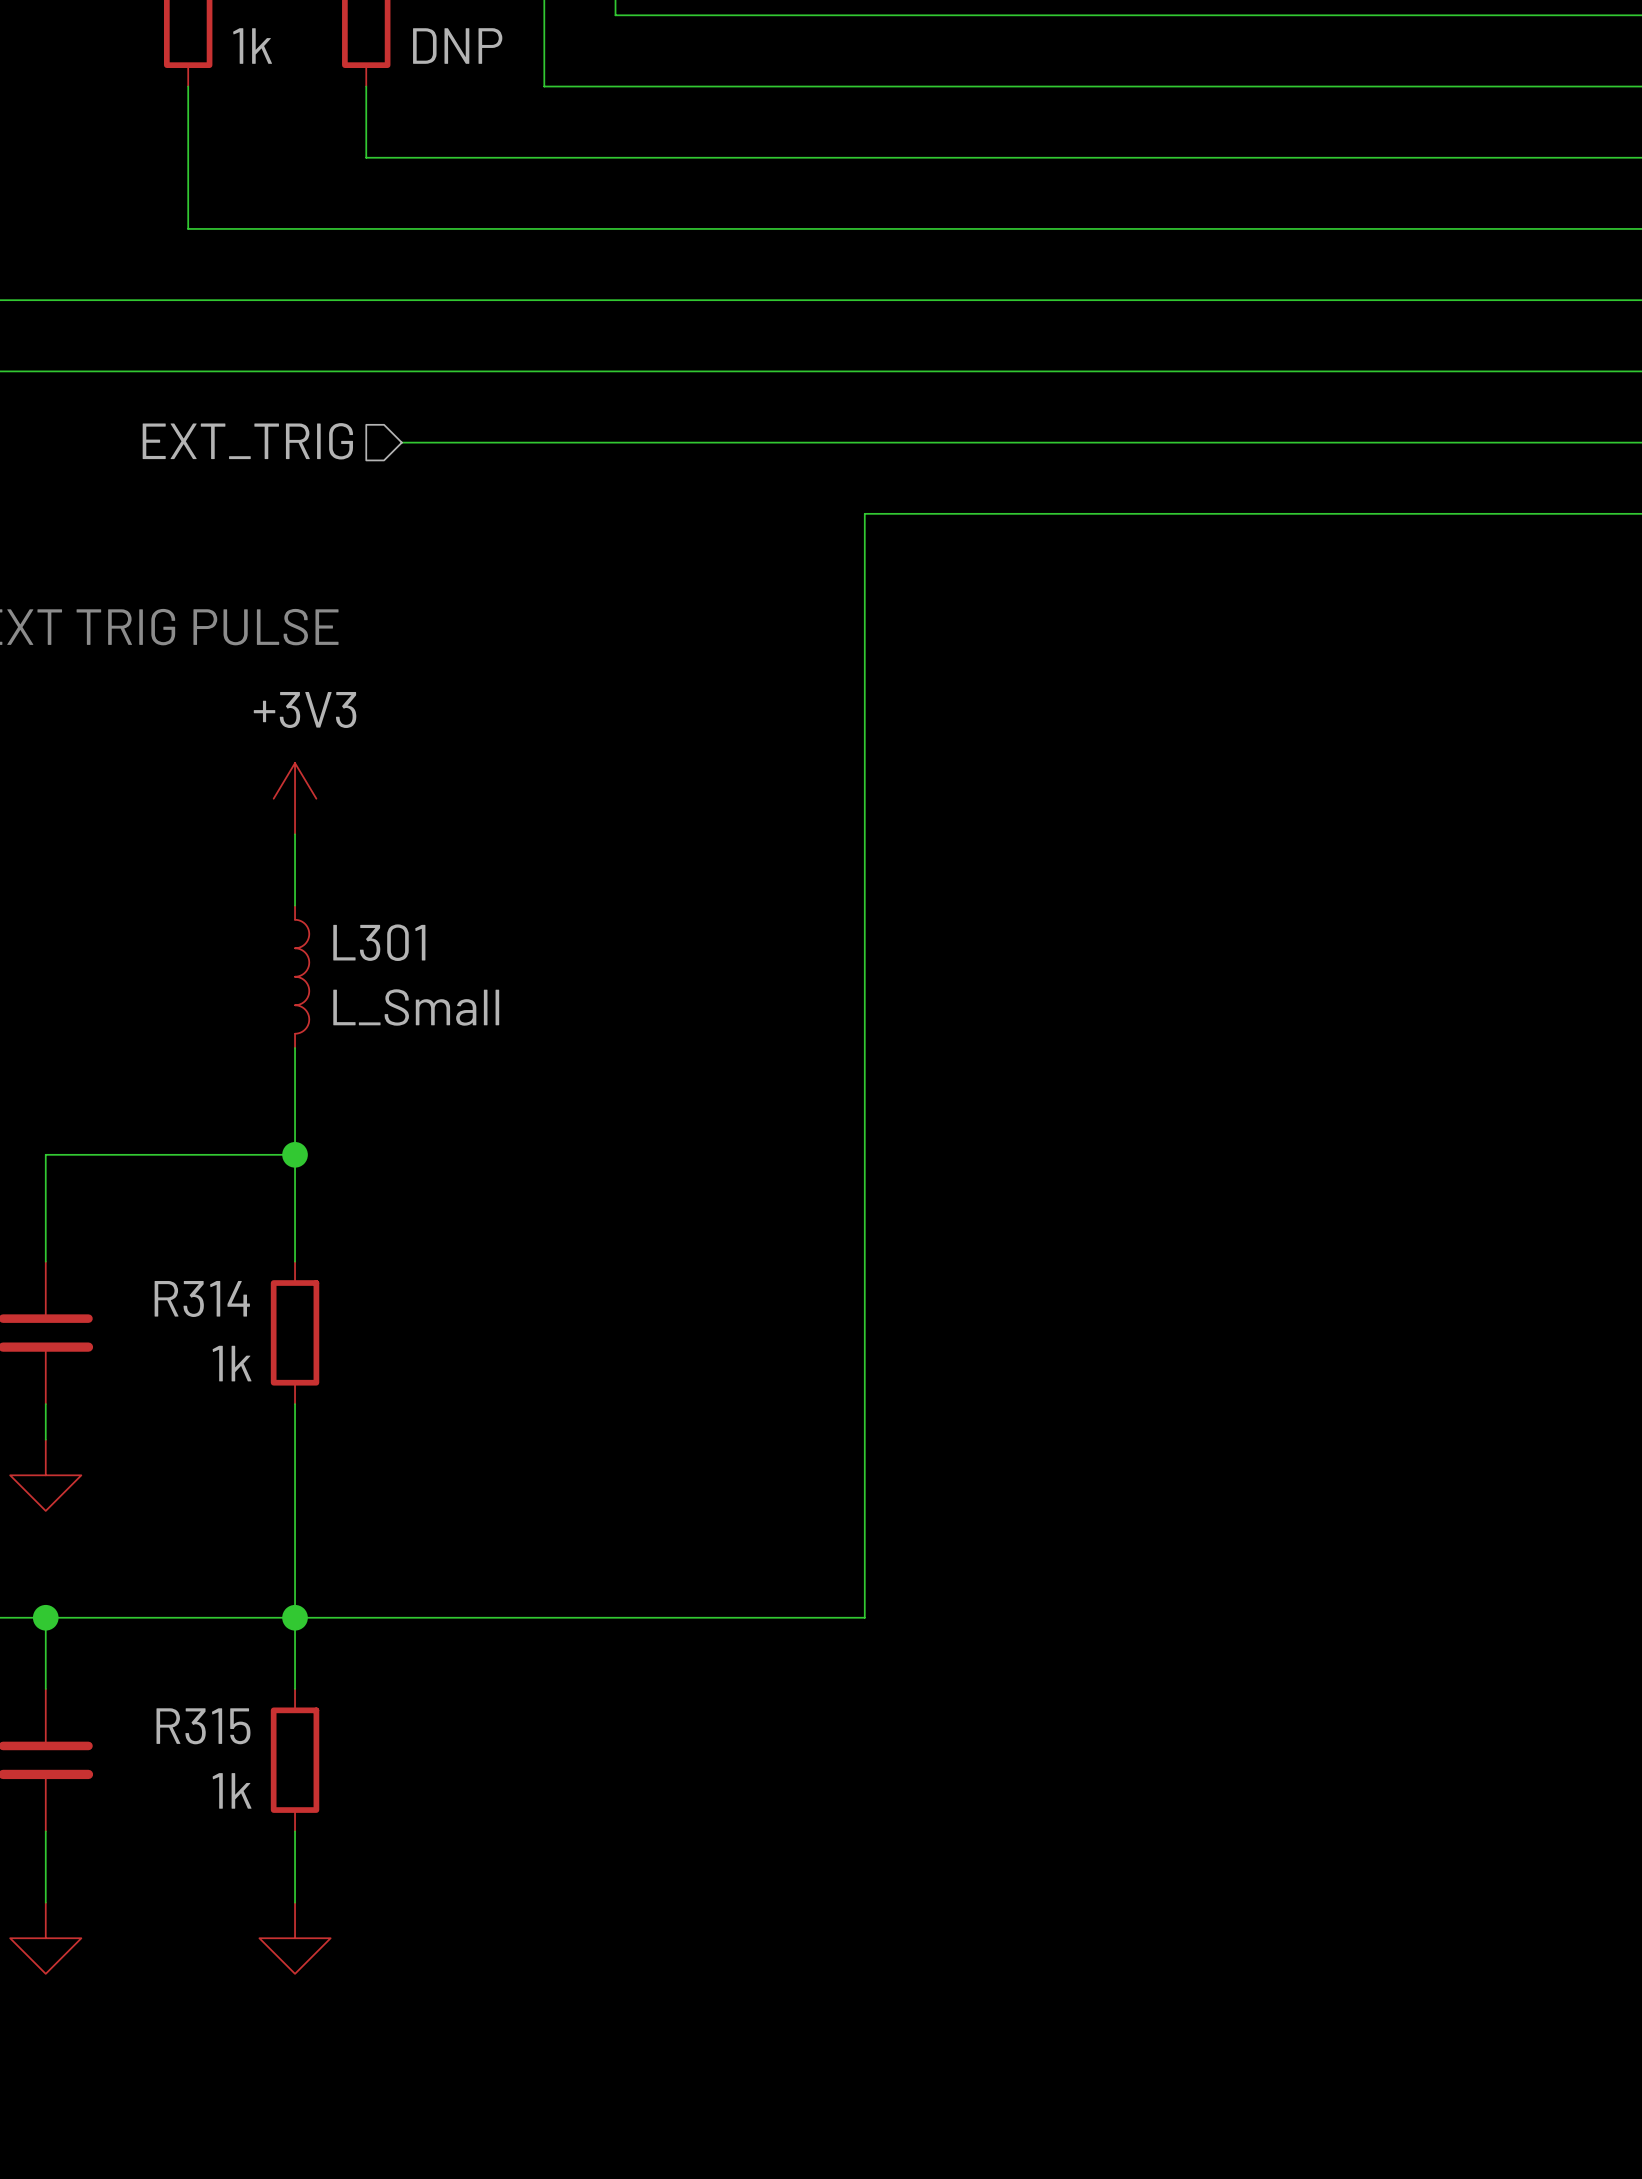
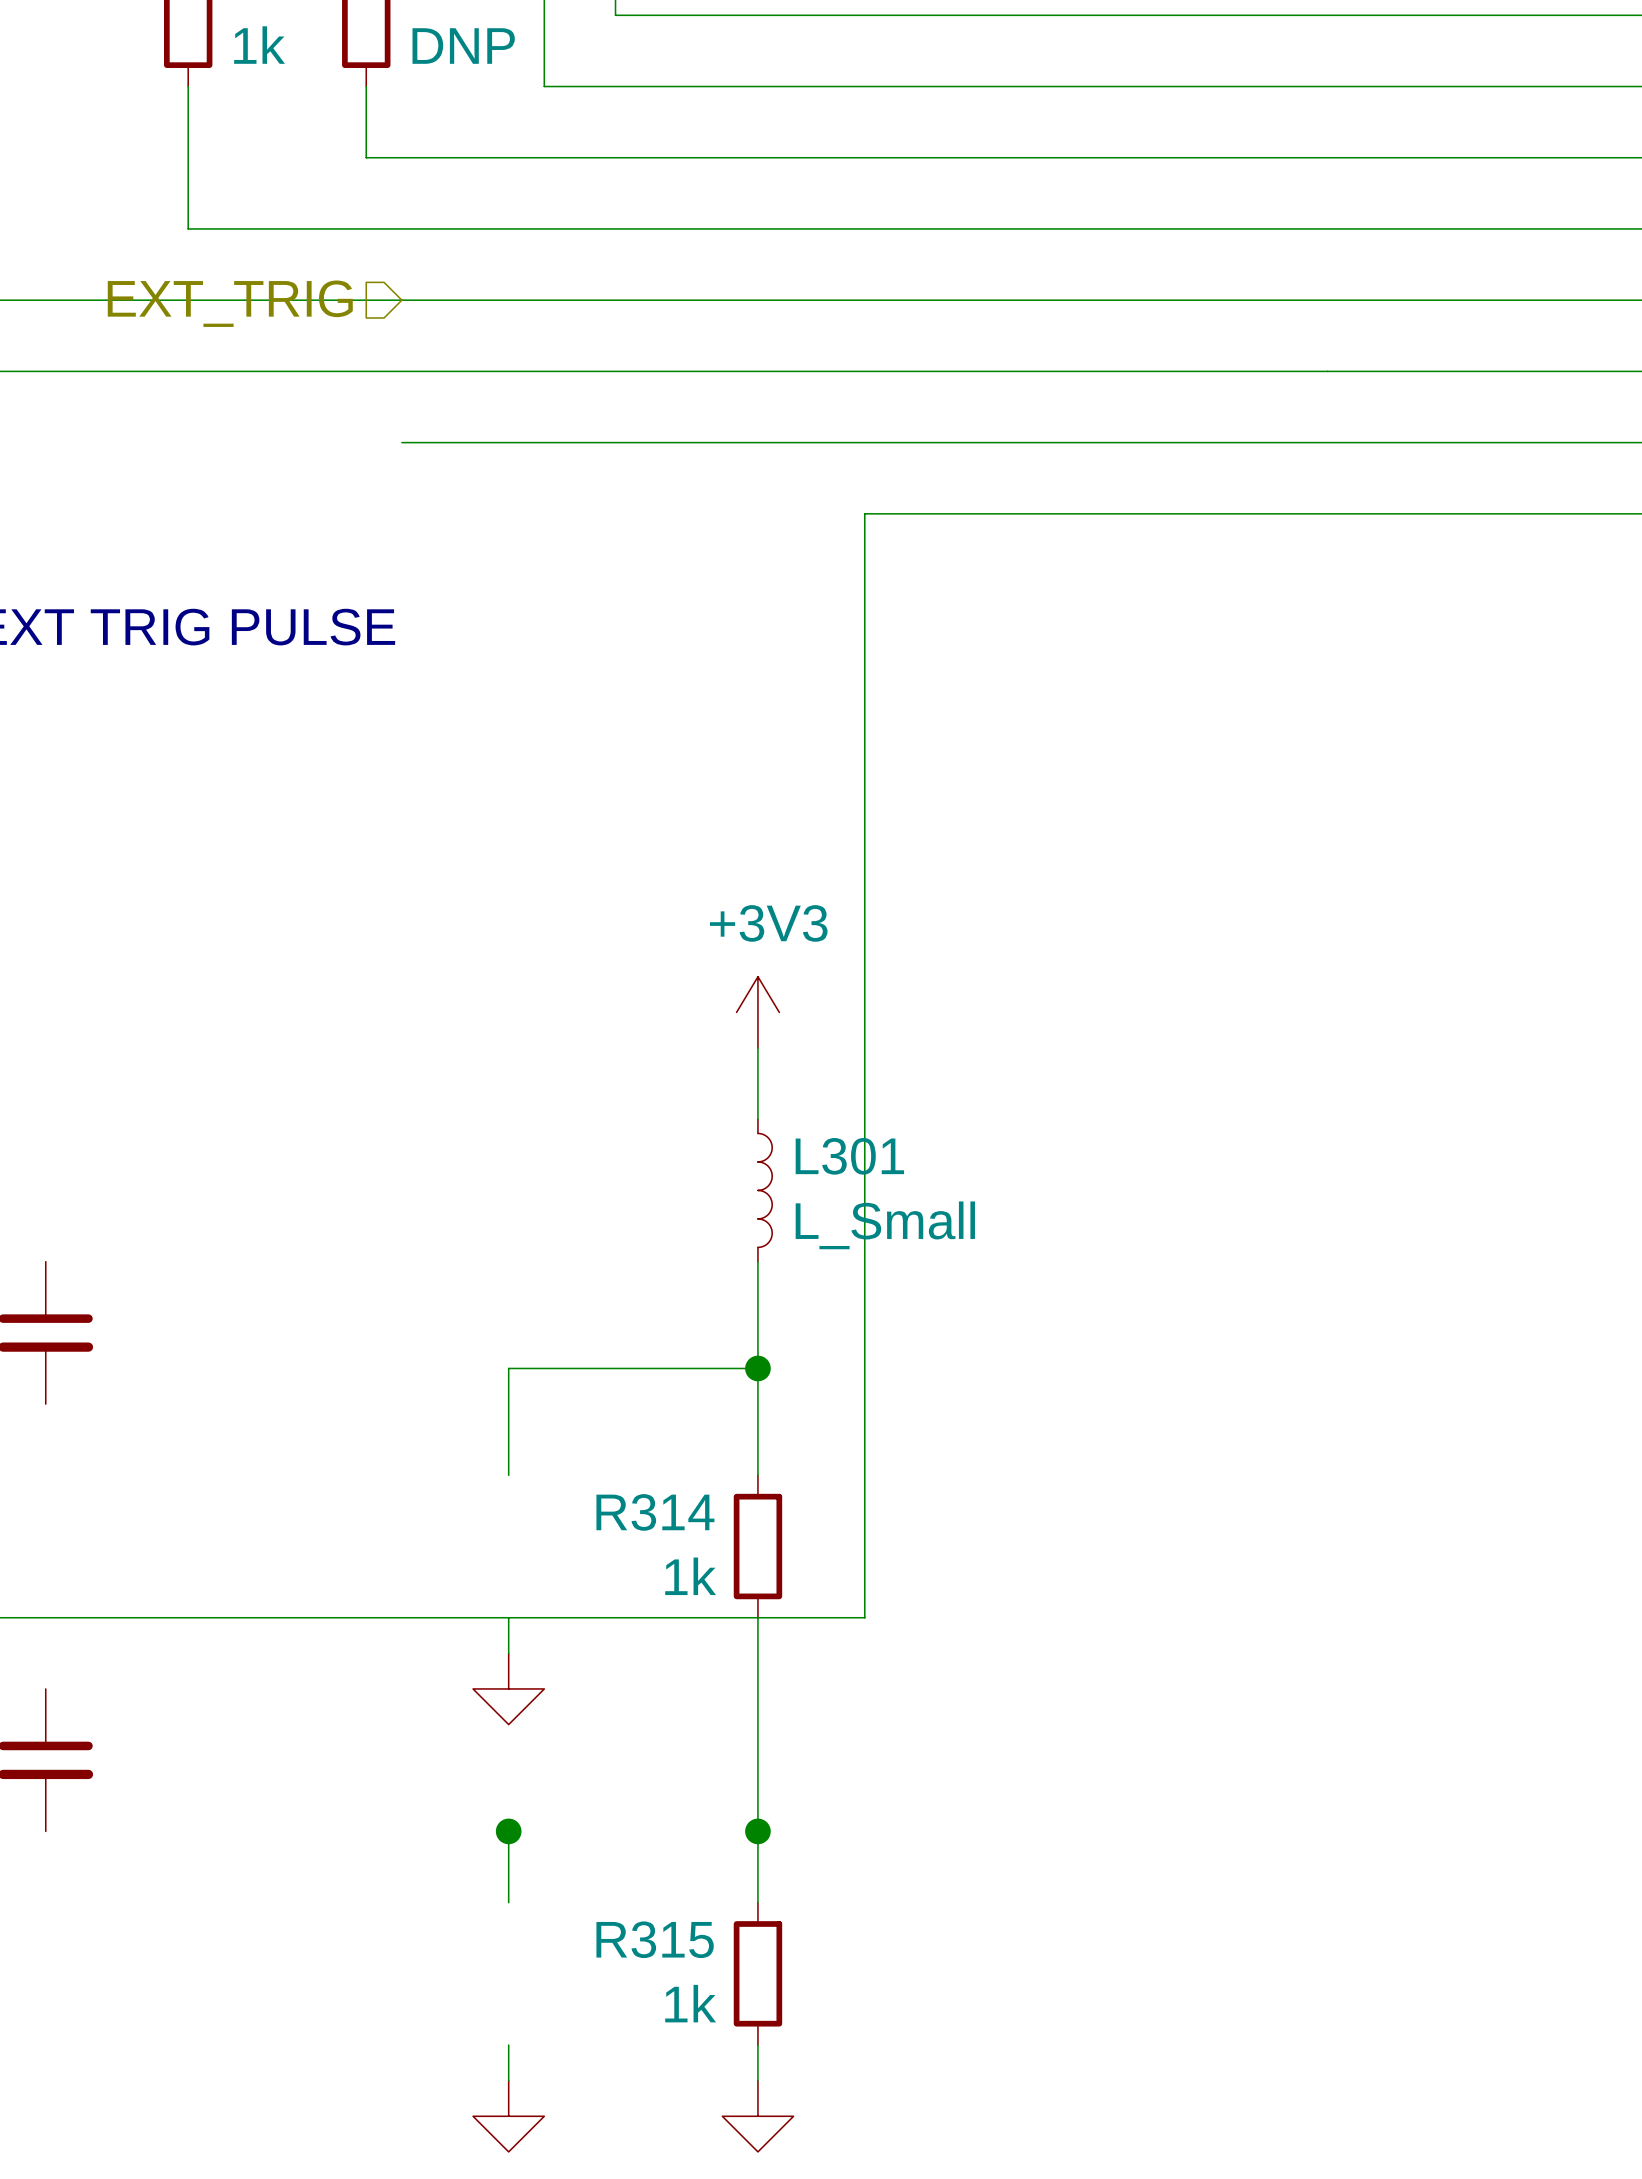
hierarchical label position: EXT_TRIG (247, 441) -> EXT_TRIG (230, 303)
power symbol position: +3V3 (295, 798) -> +3V3 (757, 1012)
wire: (295, 834) (295, 905) -> (757, 1047) (757, 1119)
L301 position: (302, 976) -> (765, 1190)
wire: (295, 1047) (295, 1261) -> (757, 1261) (757, 1475)
wire: (295, 1154) (45, 1154) (45, 1261) -> (757, 1368) (508, 1368) (508, 1475)
junction: (295, 1154) -> none
R314 position: (295, 1332) -> (757, 1546)
junction: none -> (757, 1368)
wire: (45, 1404) (45, 1439) -> (508, 1617) (508, 1653)
wire: (295, 1404) (295, 1688) -> (757, 1617) (757, 1902)
power symbol: (45, 1475) -> none
wire: (45, 1617) (45, 1688) -> (508, 1831) (508, 1902)
junction: (45, 1617) -> none
junction: (295, 1617) -> none
power symbol: none -> (508, 1688)
R315 position: (295, 1760) -> (757, 1973)
wire: (45, 1831) (45, 1902) -> none
wire: (295, 1831) (295, 1902) -> none
junction: none -> (508, 1831)
junction: none -> (757, 1831)
power symbol: (45, 1938) -> none
power symbol: (295, 1938) -> none
wire: none -> (508, 2045) (508, 2080)
wire: none -> (757, 2045) (757, 2080)
power symbol: none -> (508, 2116)
power symbol: none -> (757, 2116)

